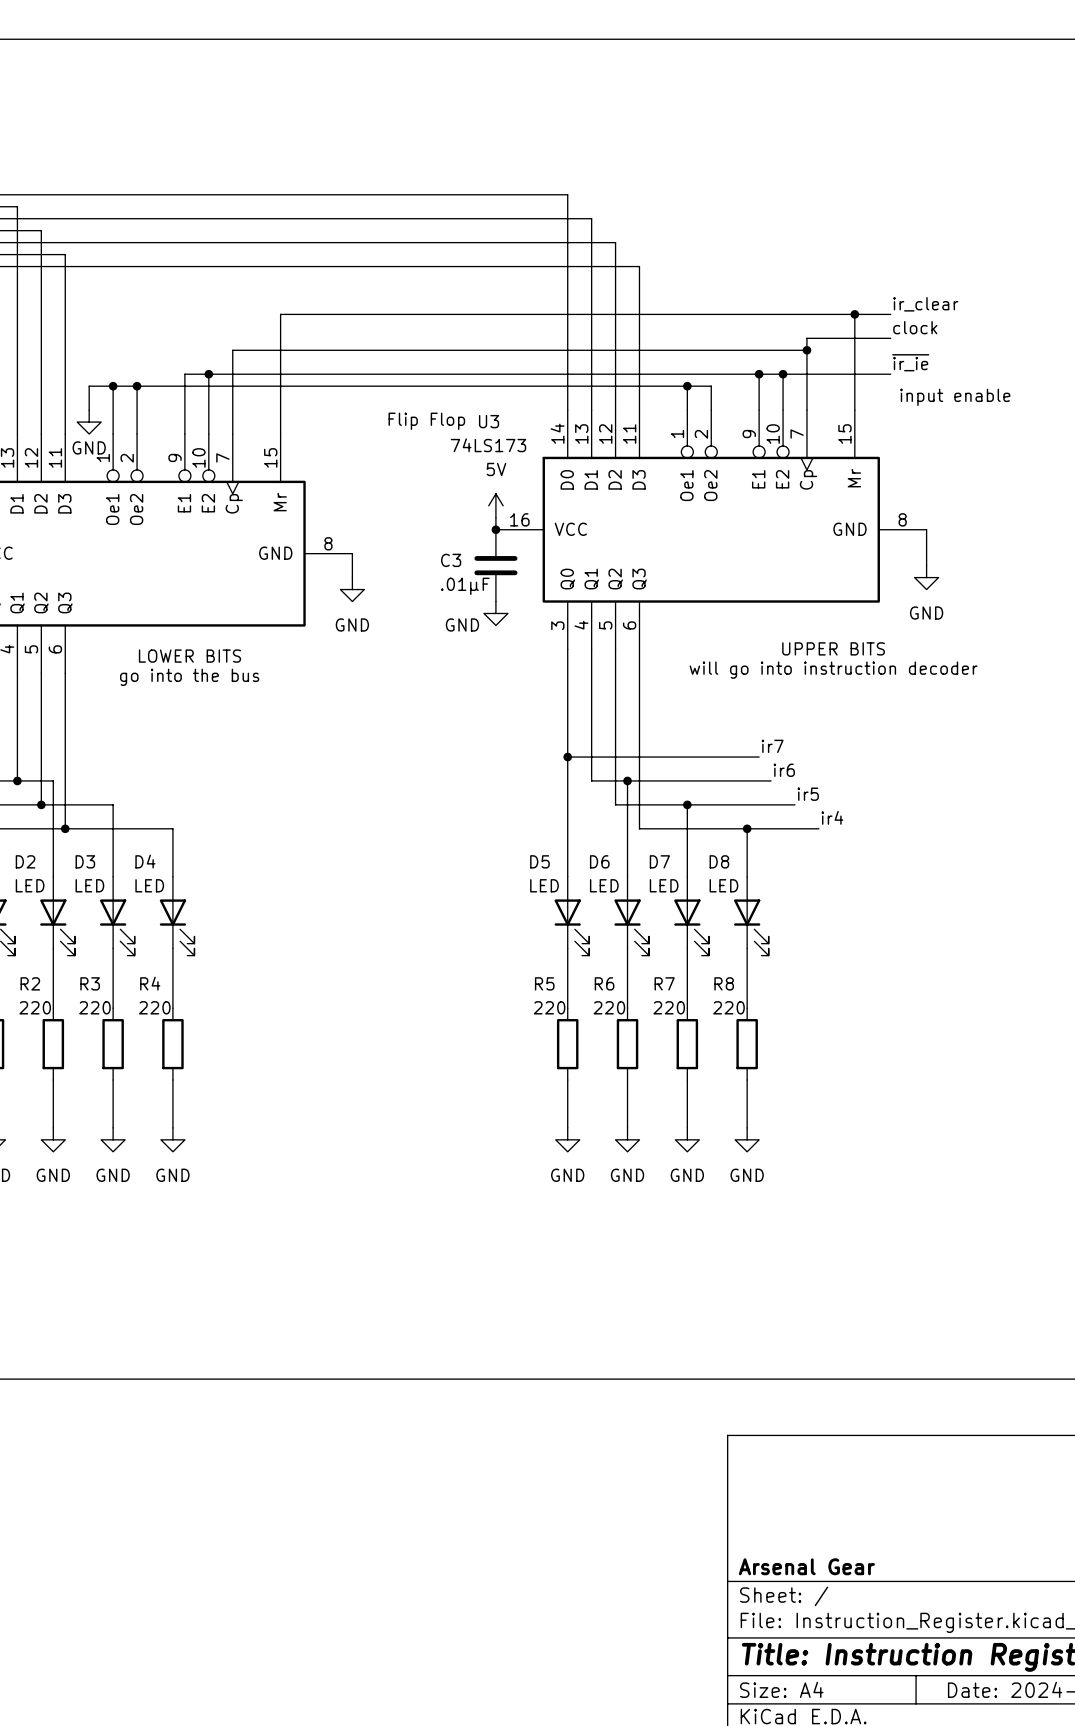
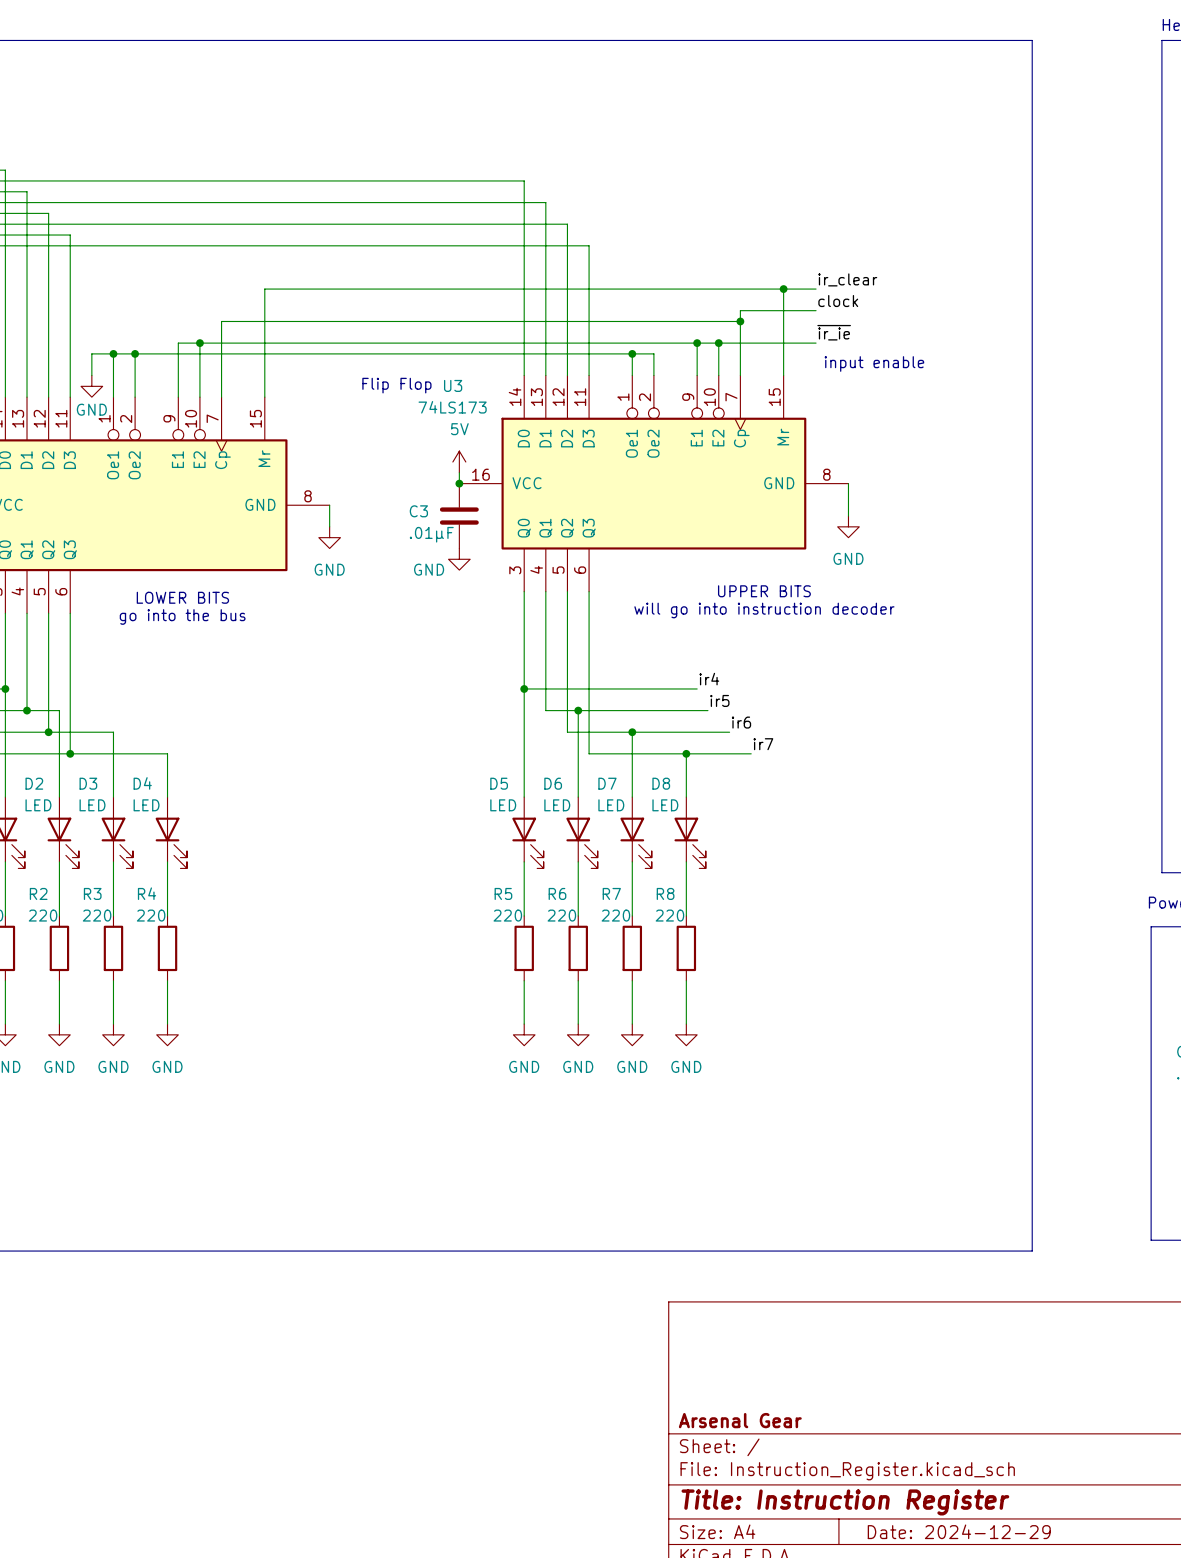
label: ir7 (772, 746) -> ir4 (709, 679)
label: ir6 (784, 770) -> ir5 (719, 700)
label: ir5 (808, 794) -> ir6 (741, 722)
label: ir4 (832, 817) -> ir7 (763, 744)

